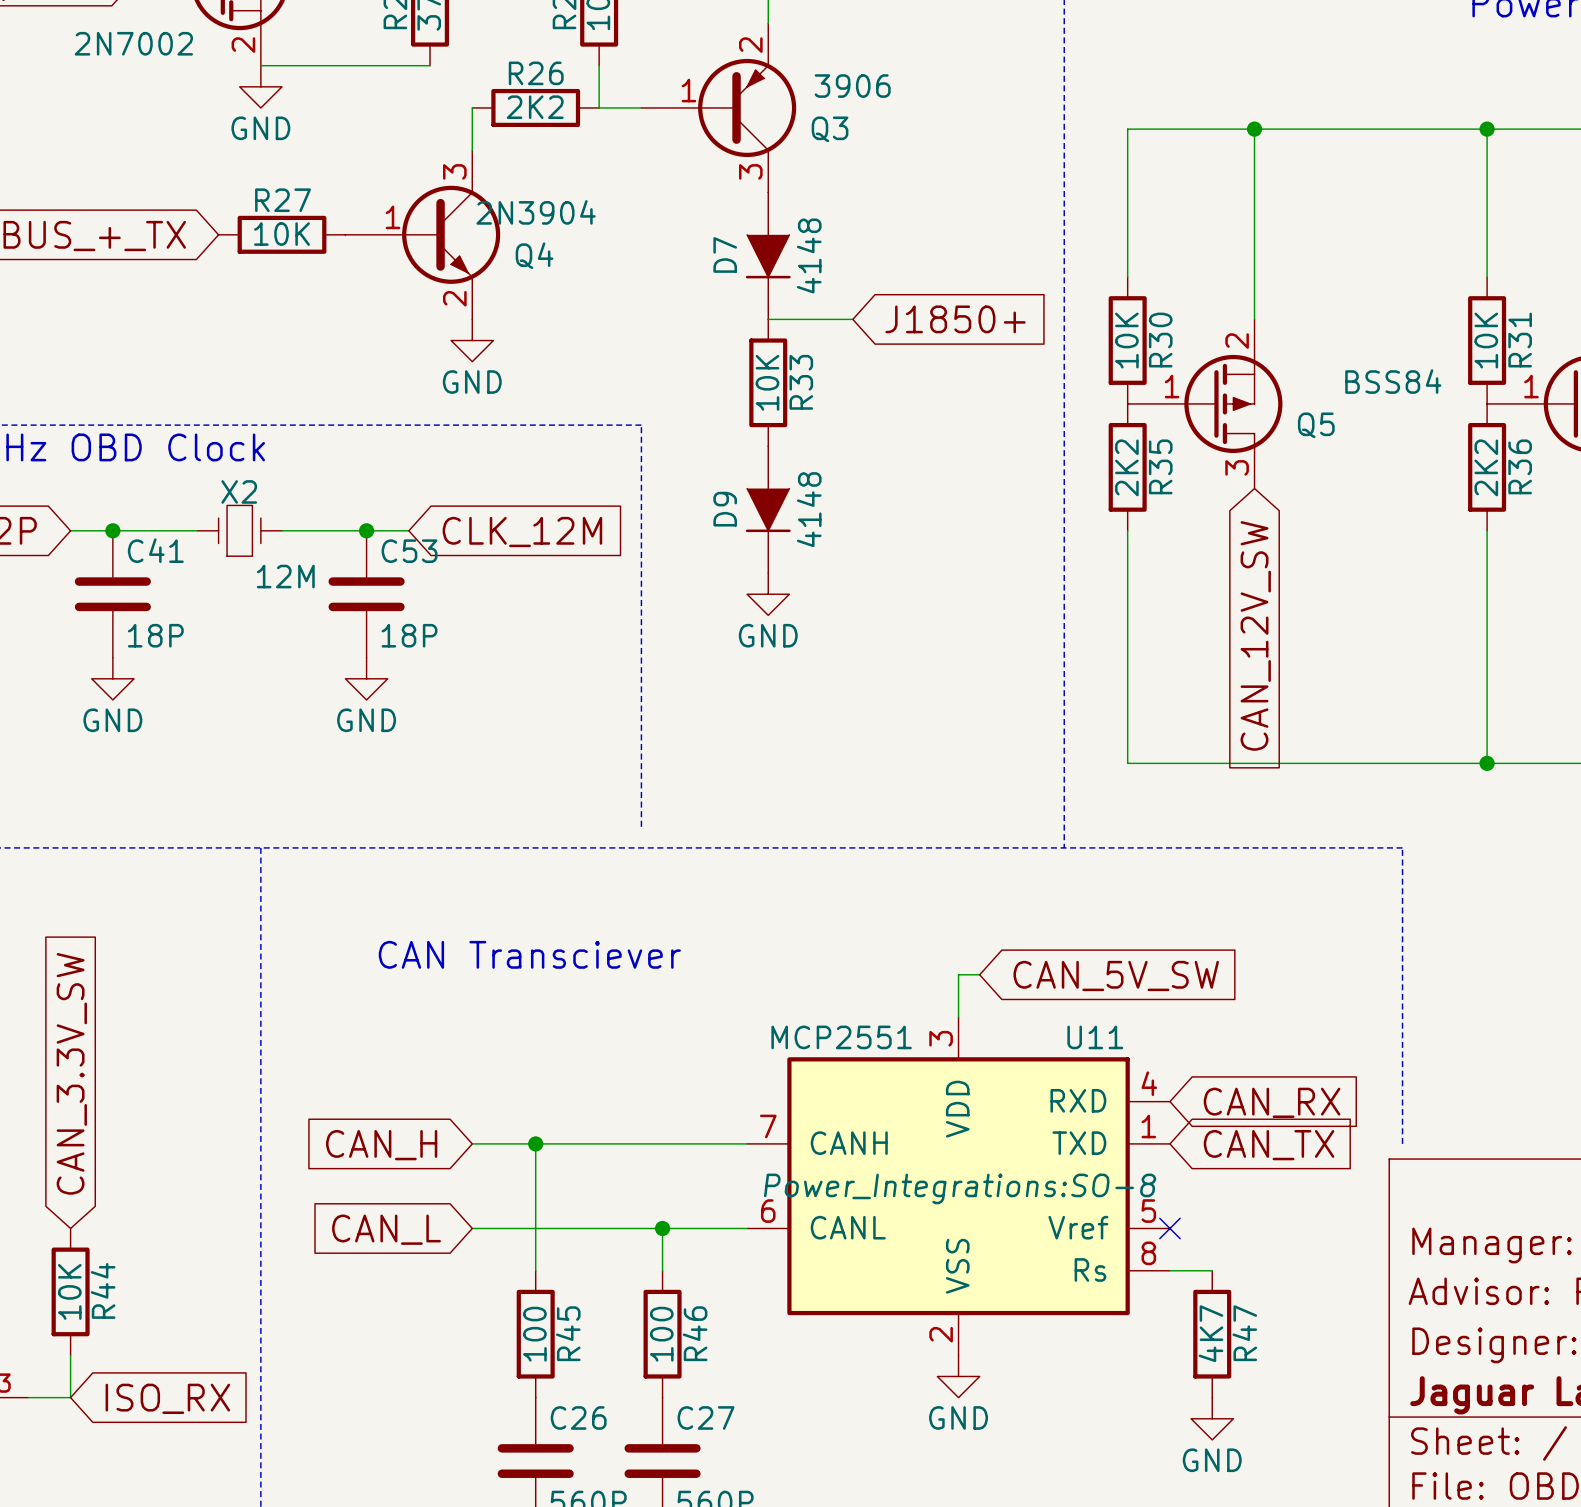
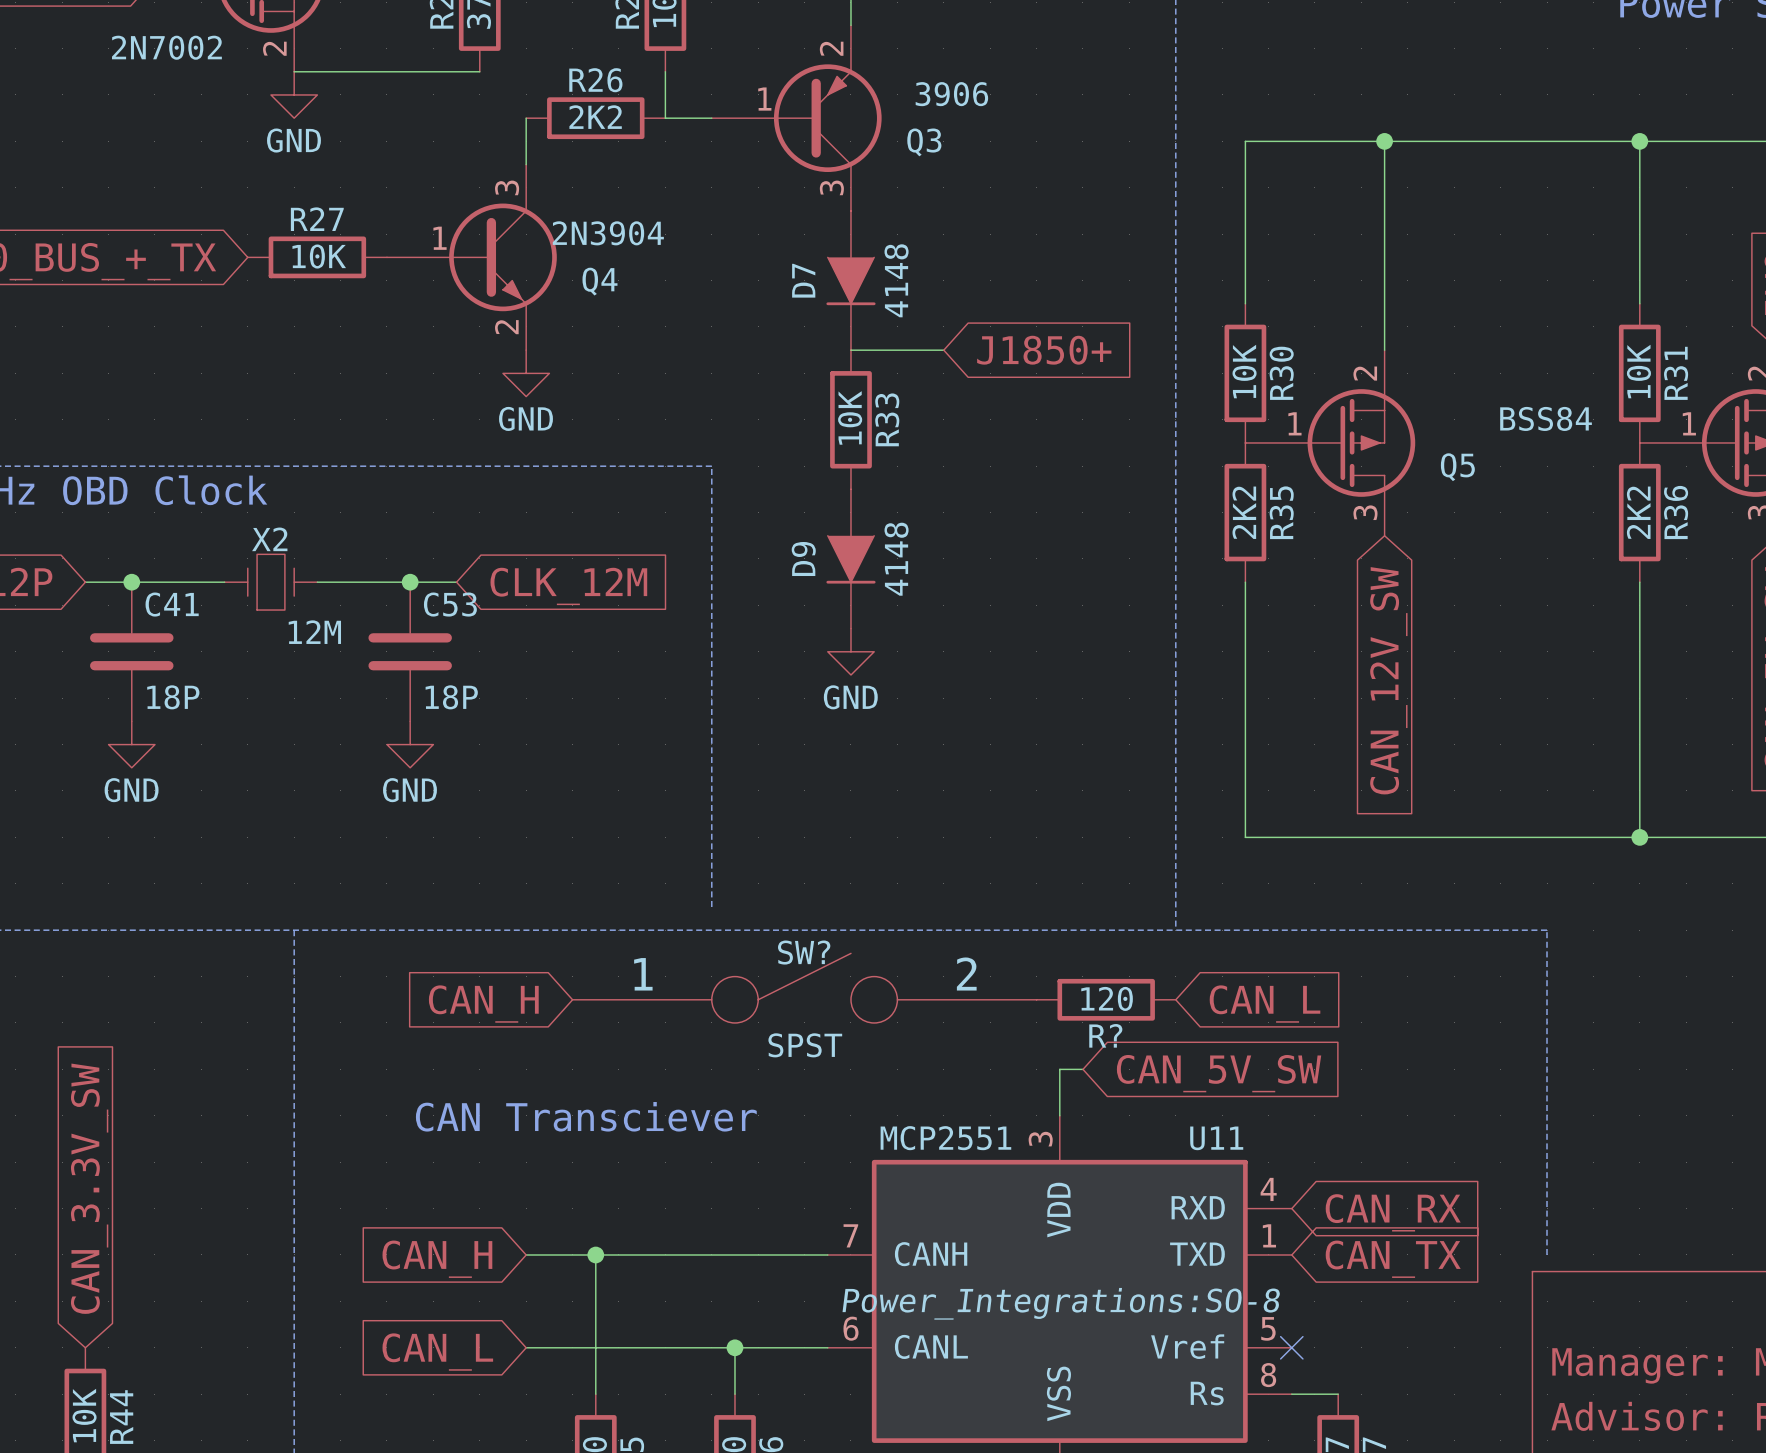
SW?: none -> SPST (804, 988)
R?: none -> 120 (1106, 999)
global label: none -> CAN_H (483, 1004)
global label: none -> CAN_L (1265, 1004)
text position: CAN Transciever (529, 954) -> CAN Transciever (586, 1116)

